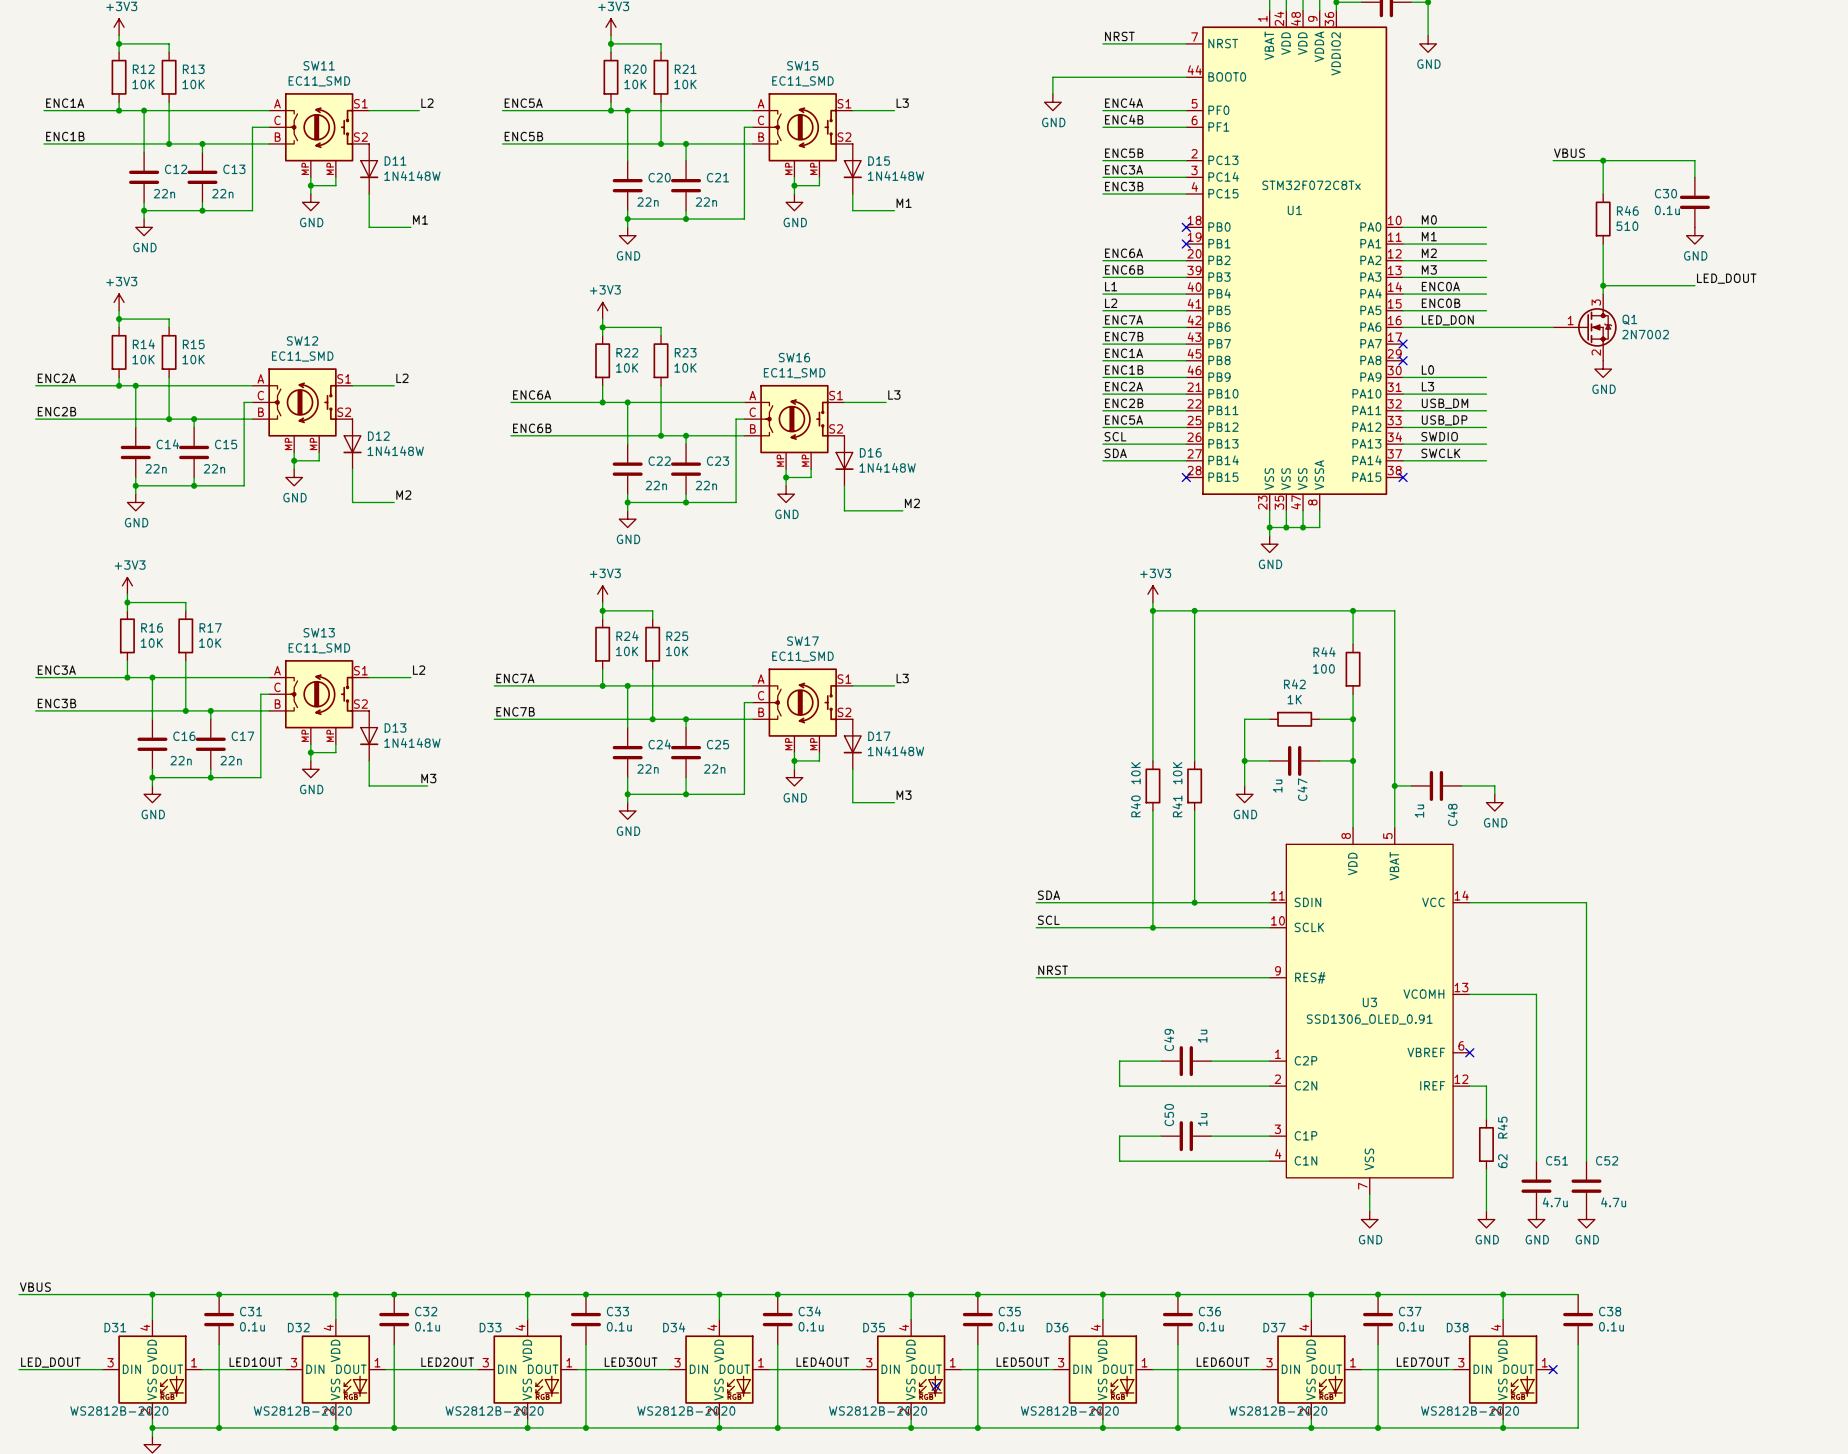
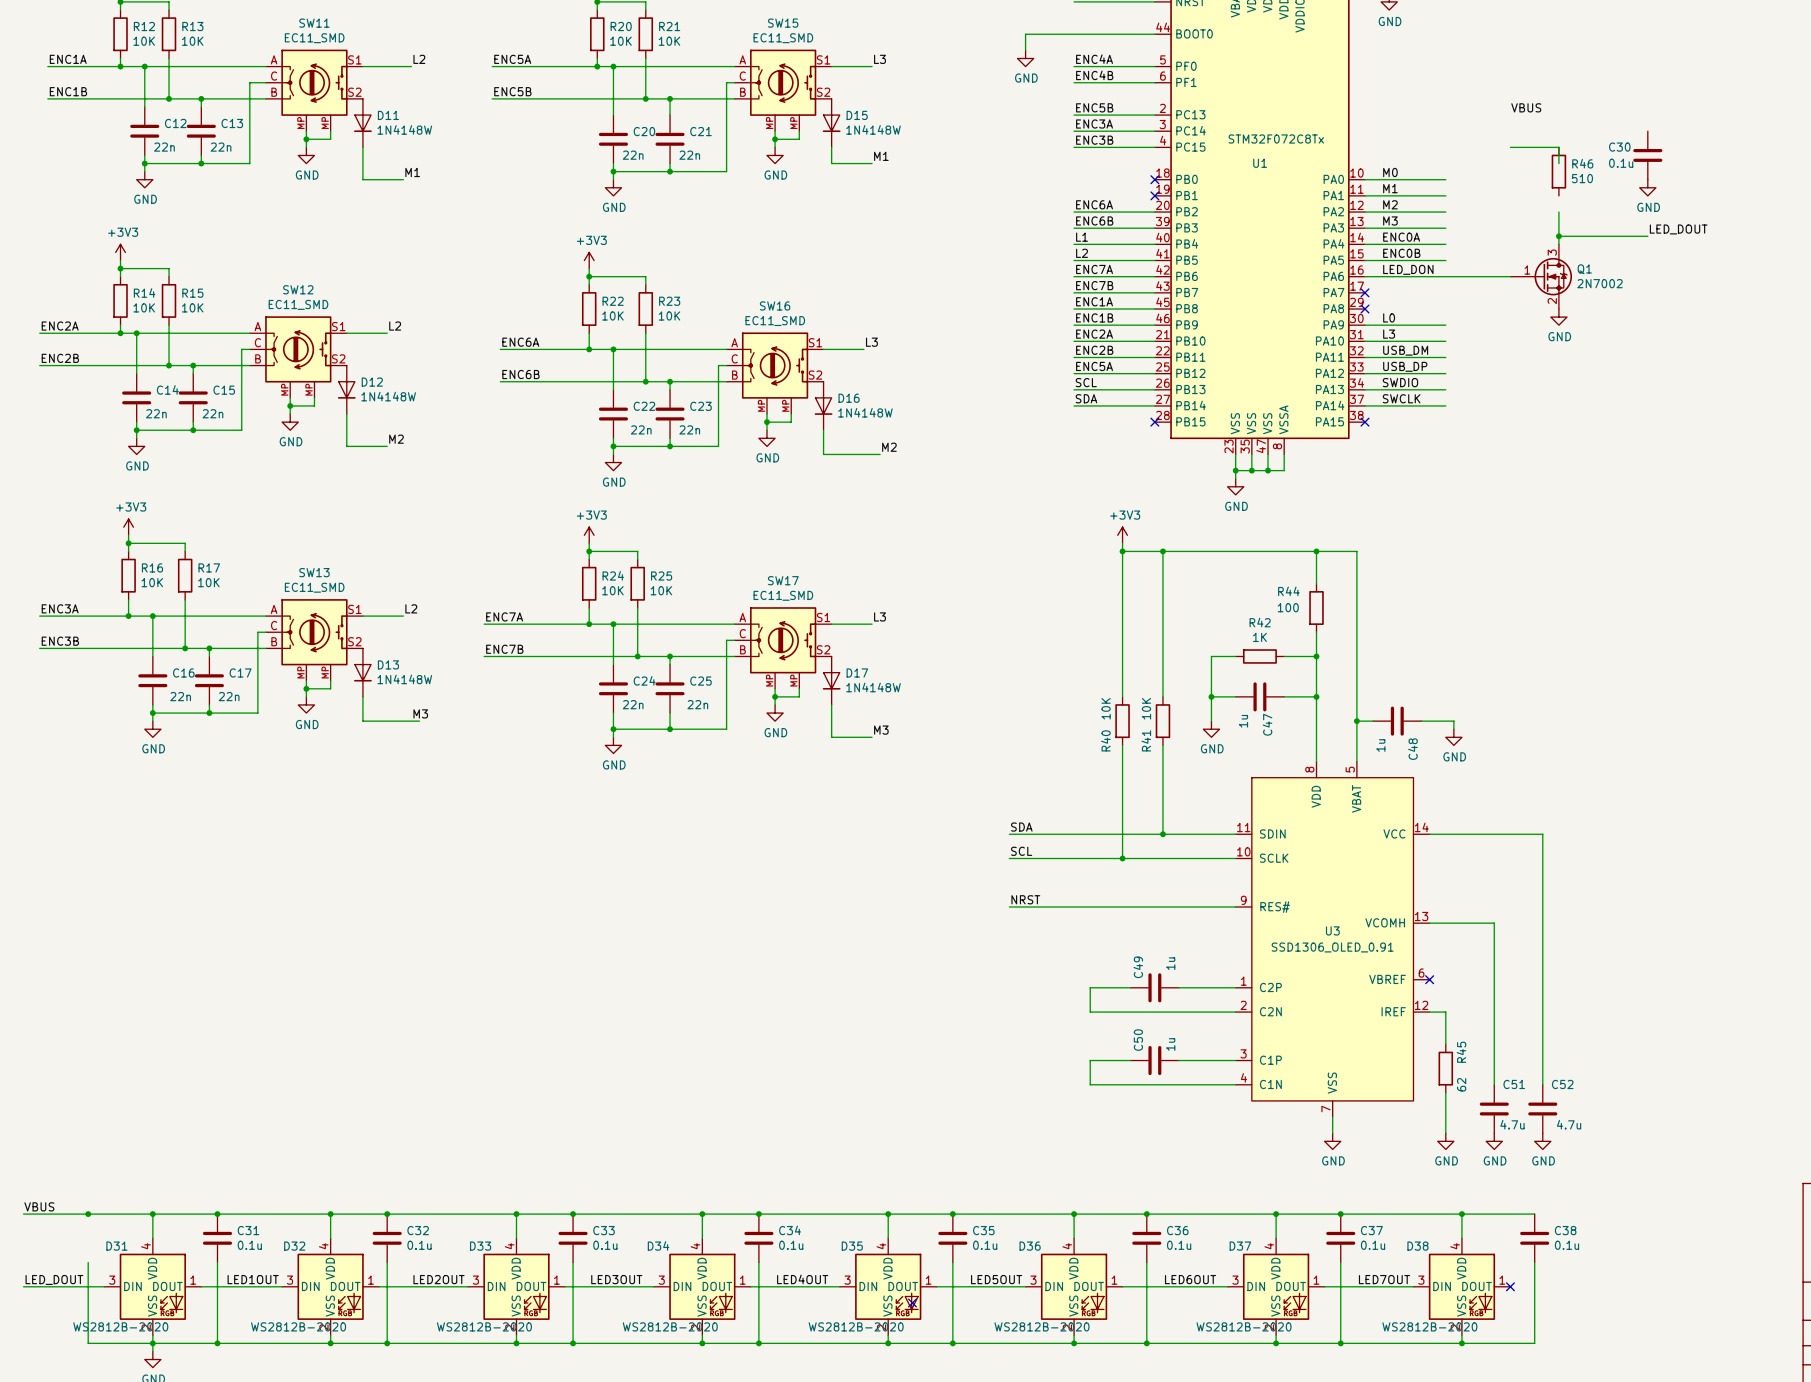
wire: (1553, 160) (1694, 160) (1694, 177) -> none
wire: (1603, 160) (1603, 194) -> none
junction: (1603, 160) -> none
wire: none -> (1510, 147) (1558, 147) (1558, 163)
wire: (1603, 244) (1603, 260) -> none
junction: none -> (88, 1214)
wire: none -> (88, 1262) (88, 1343) (152, 1343)

